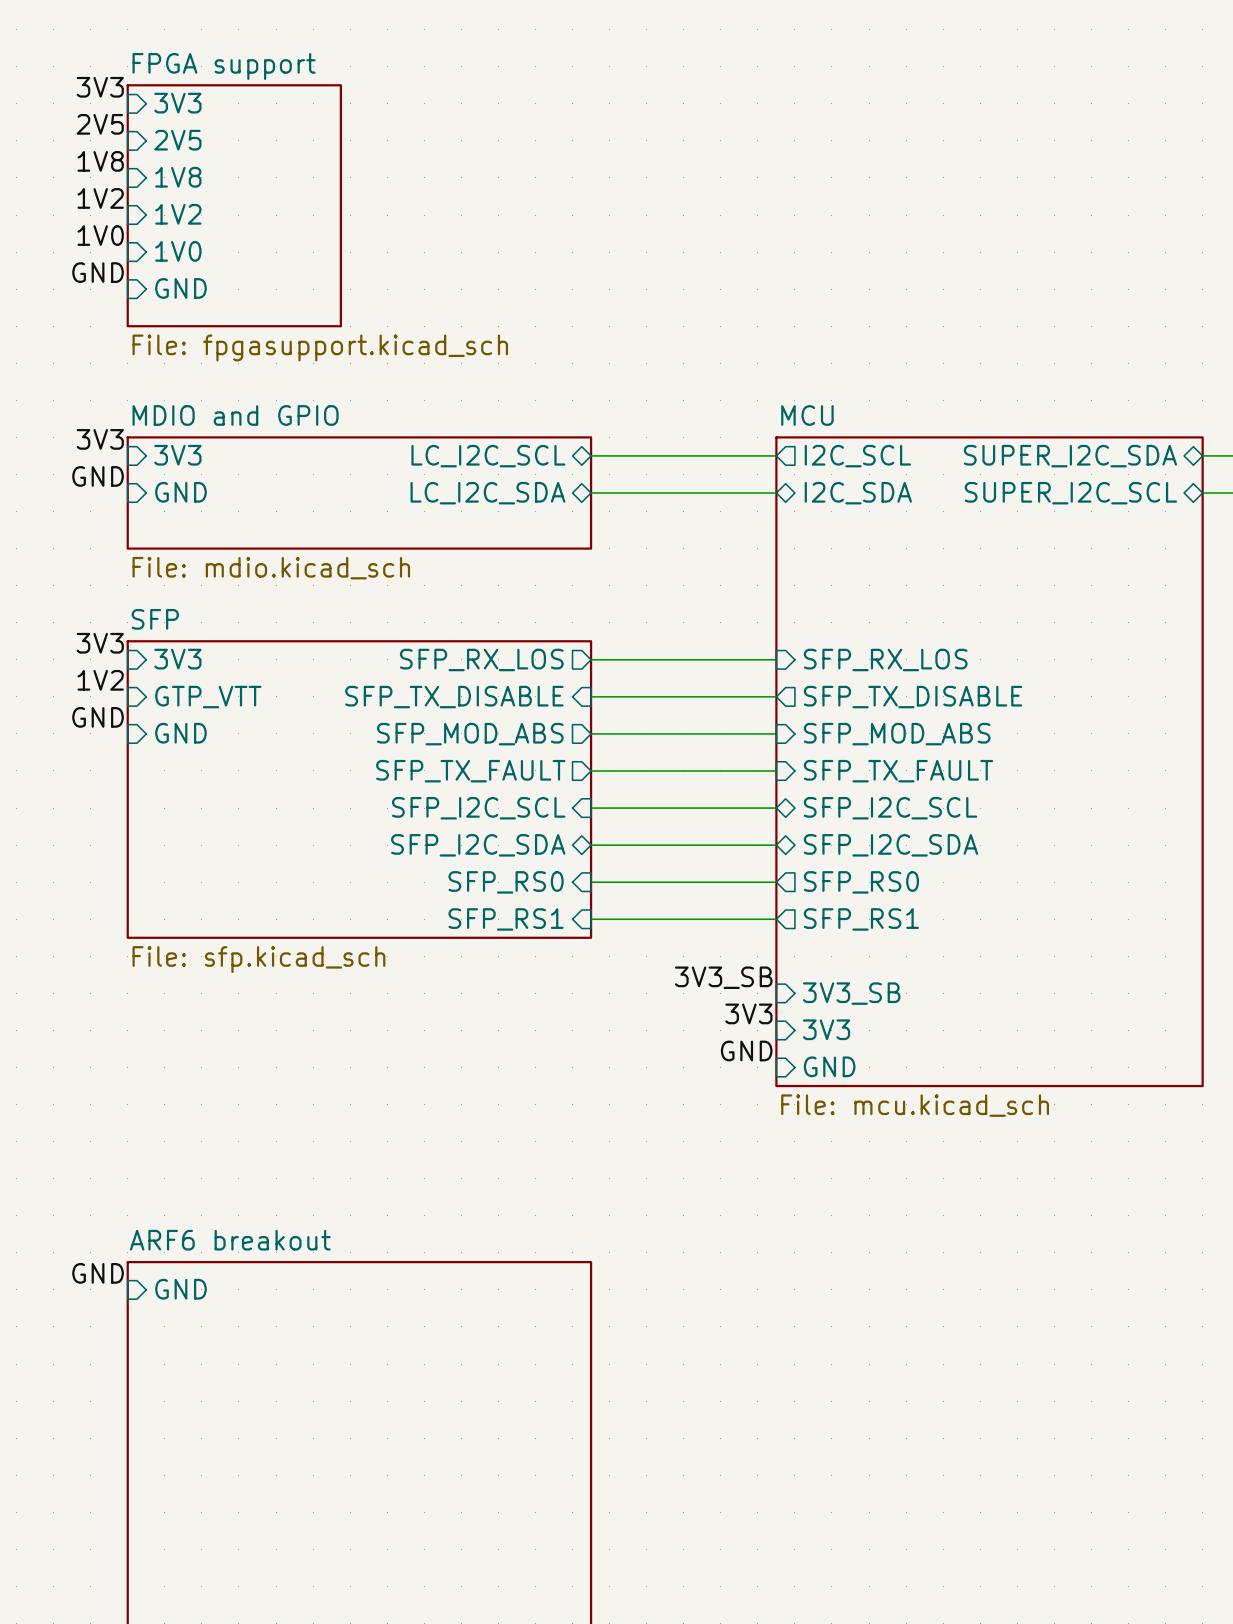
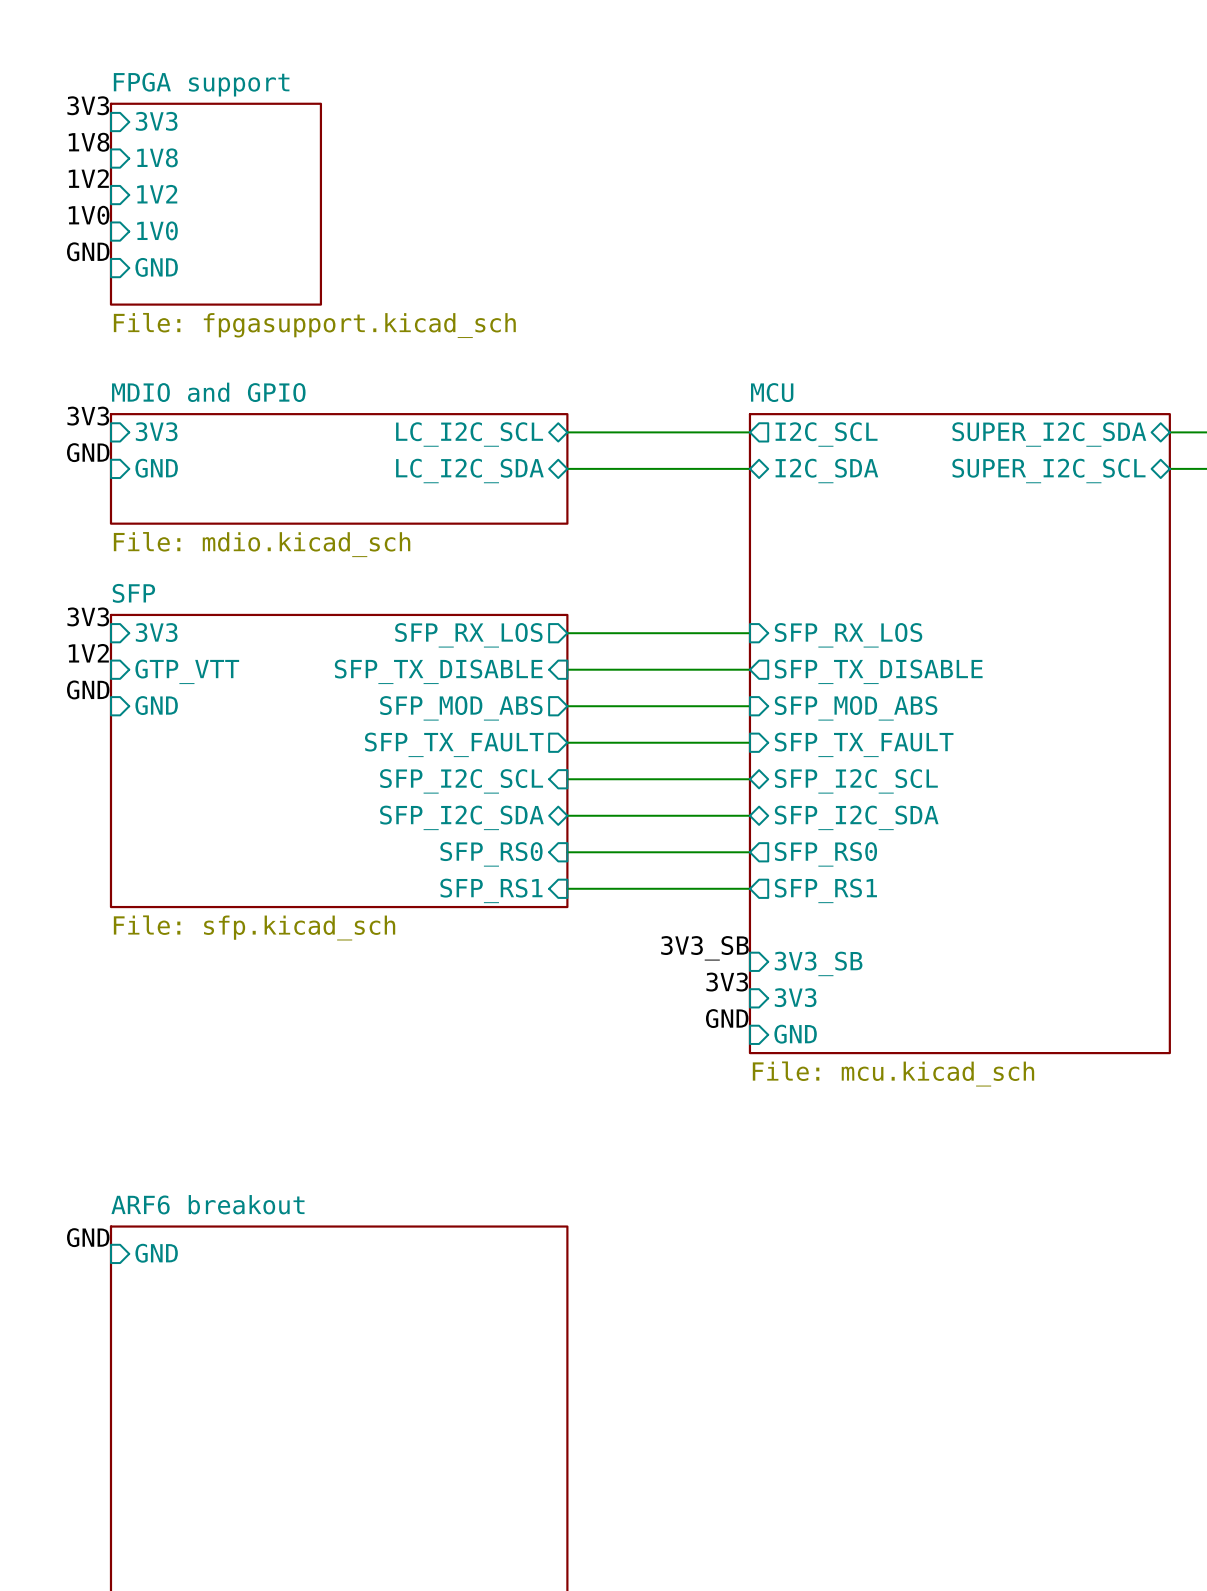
label: 3V3 (100, 87) -> none
sheet pin: 3V3 (177, 103) -> none
label: 2V5 (100, 124) -> 3V3 (88, 105)
sheet pin: 2V5 (177, 140) -> 3V3 (156, 121)
sheet FPGA support: File: fpgasupport.kicad_sch (234, 205) -> none
sheet FPGA support: none -> File: fpgasupport.kicad_sch (215, 204)

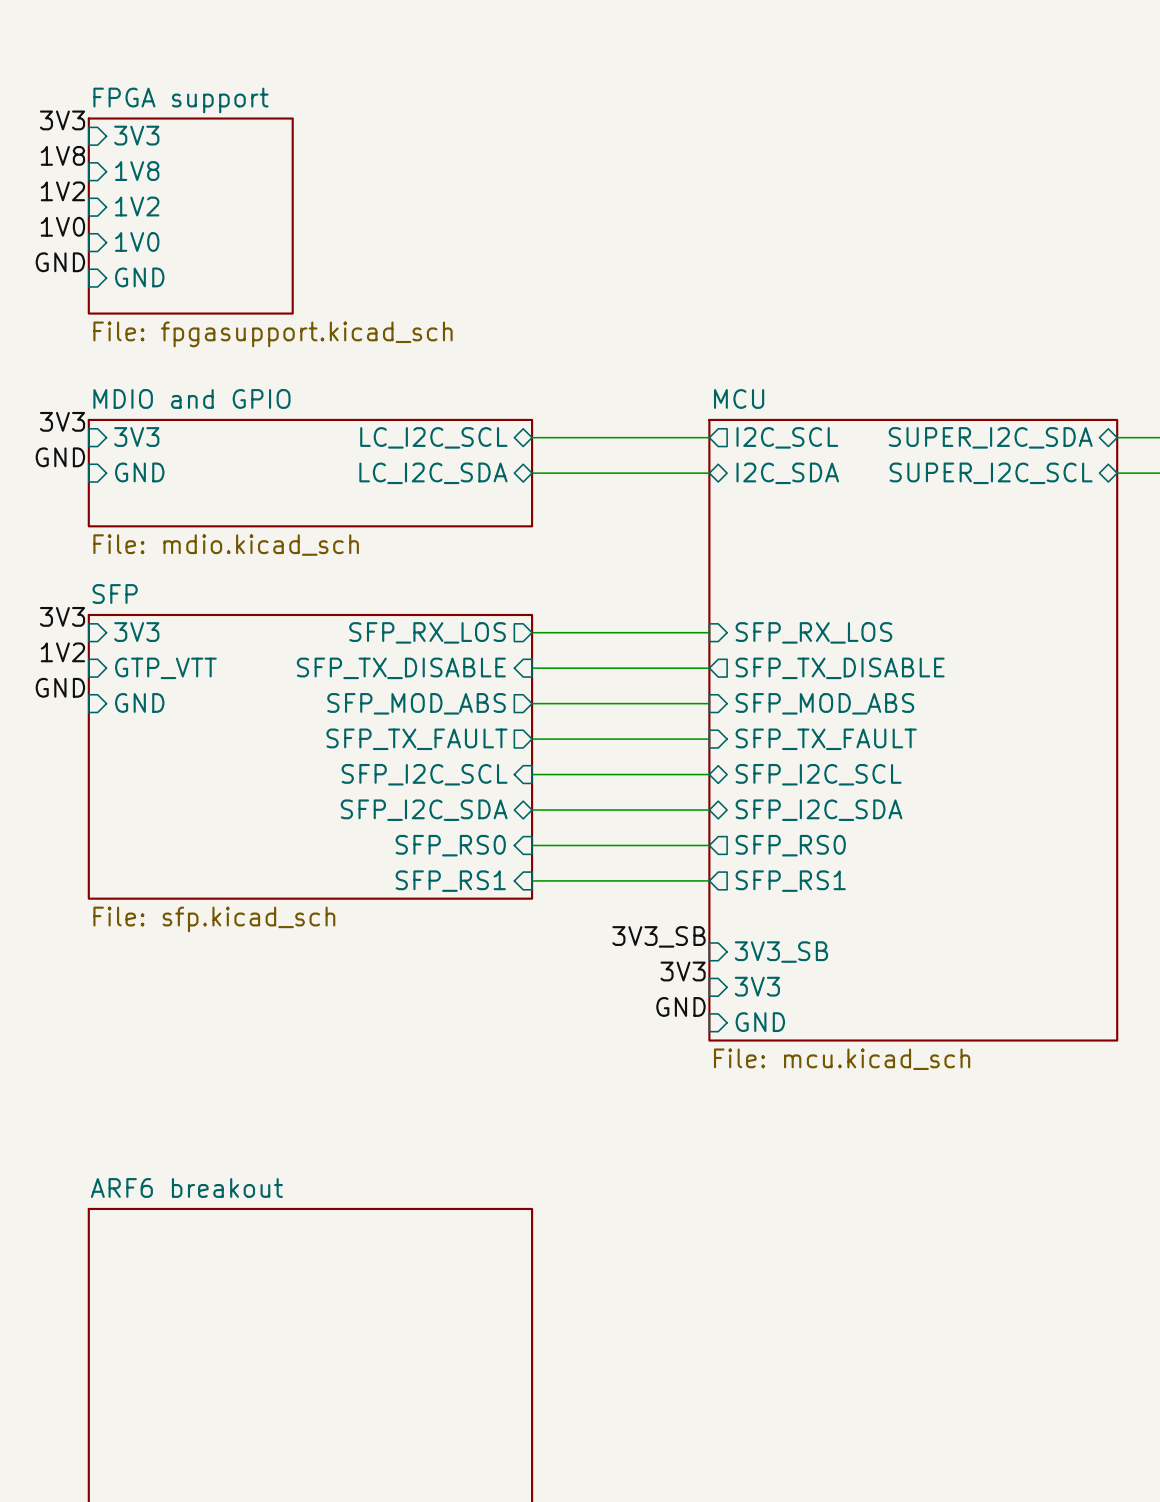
label: GND (88, 1237) -> none
sheet pin: GND (156, 1253) -> none

